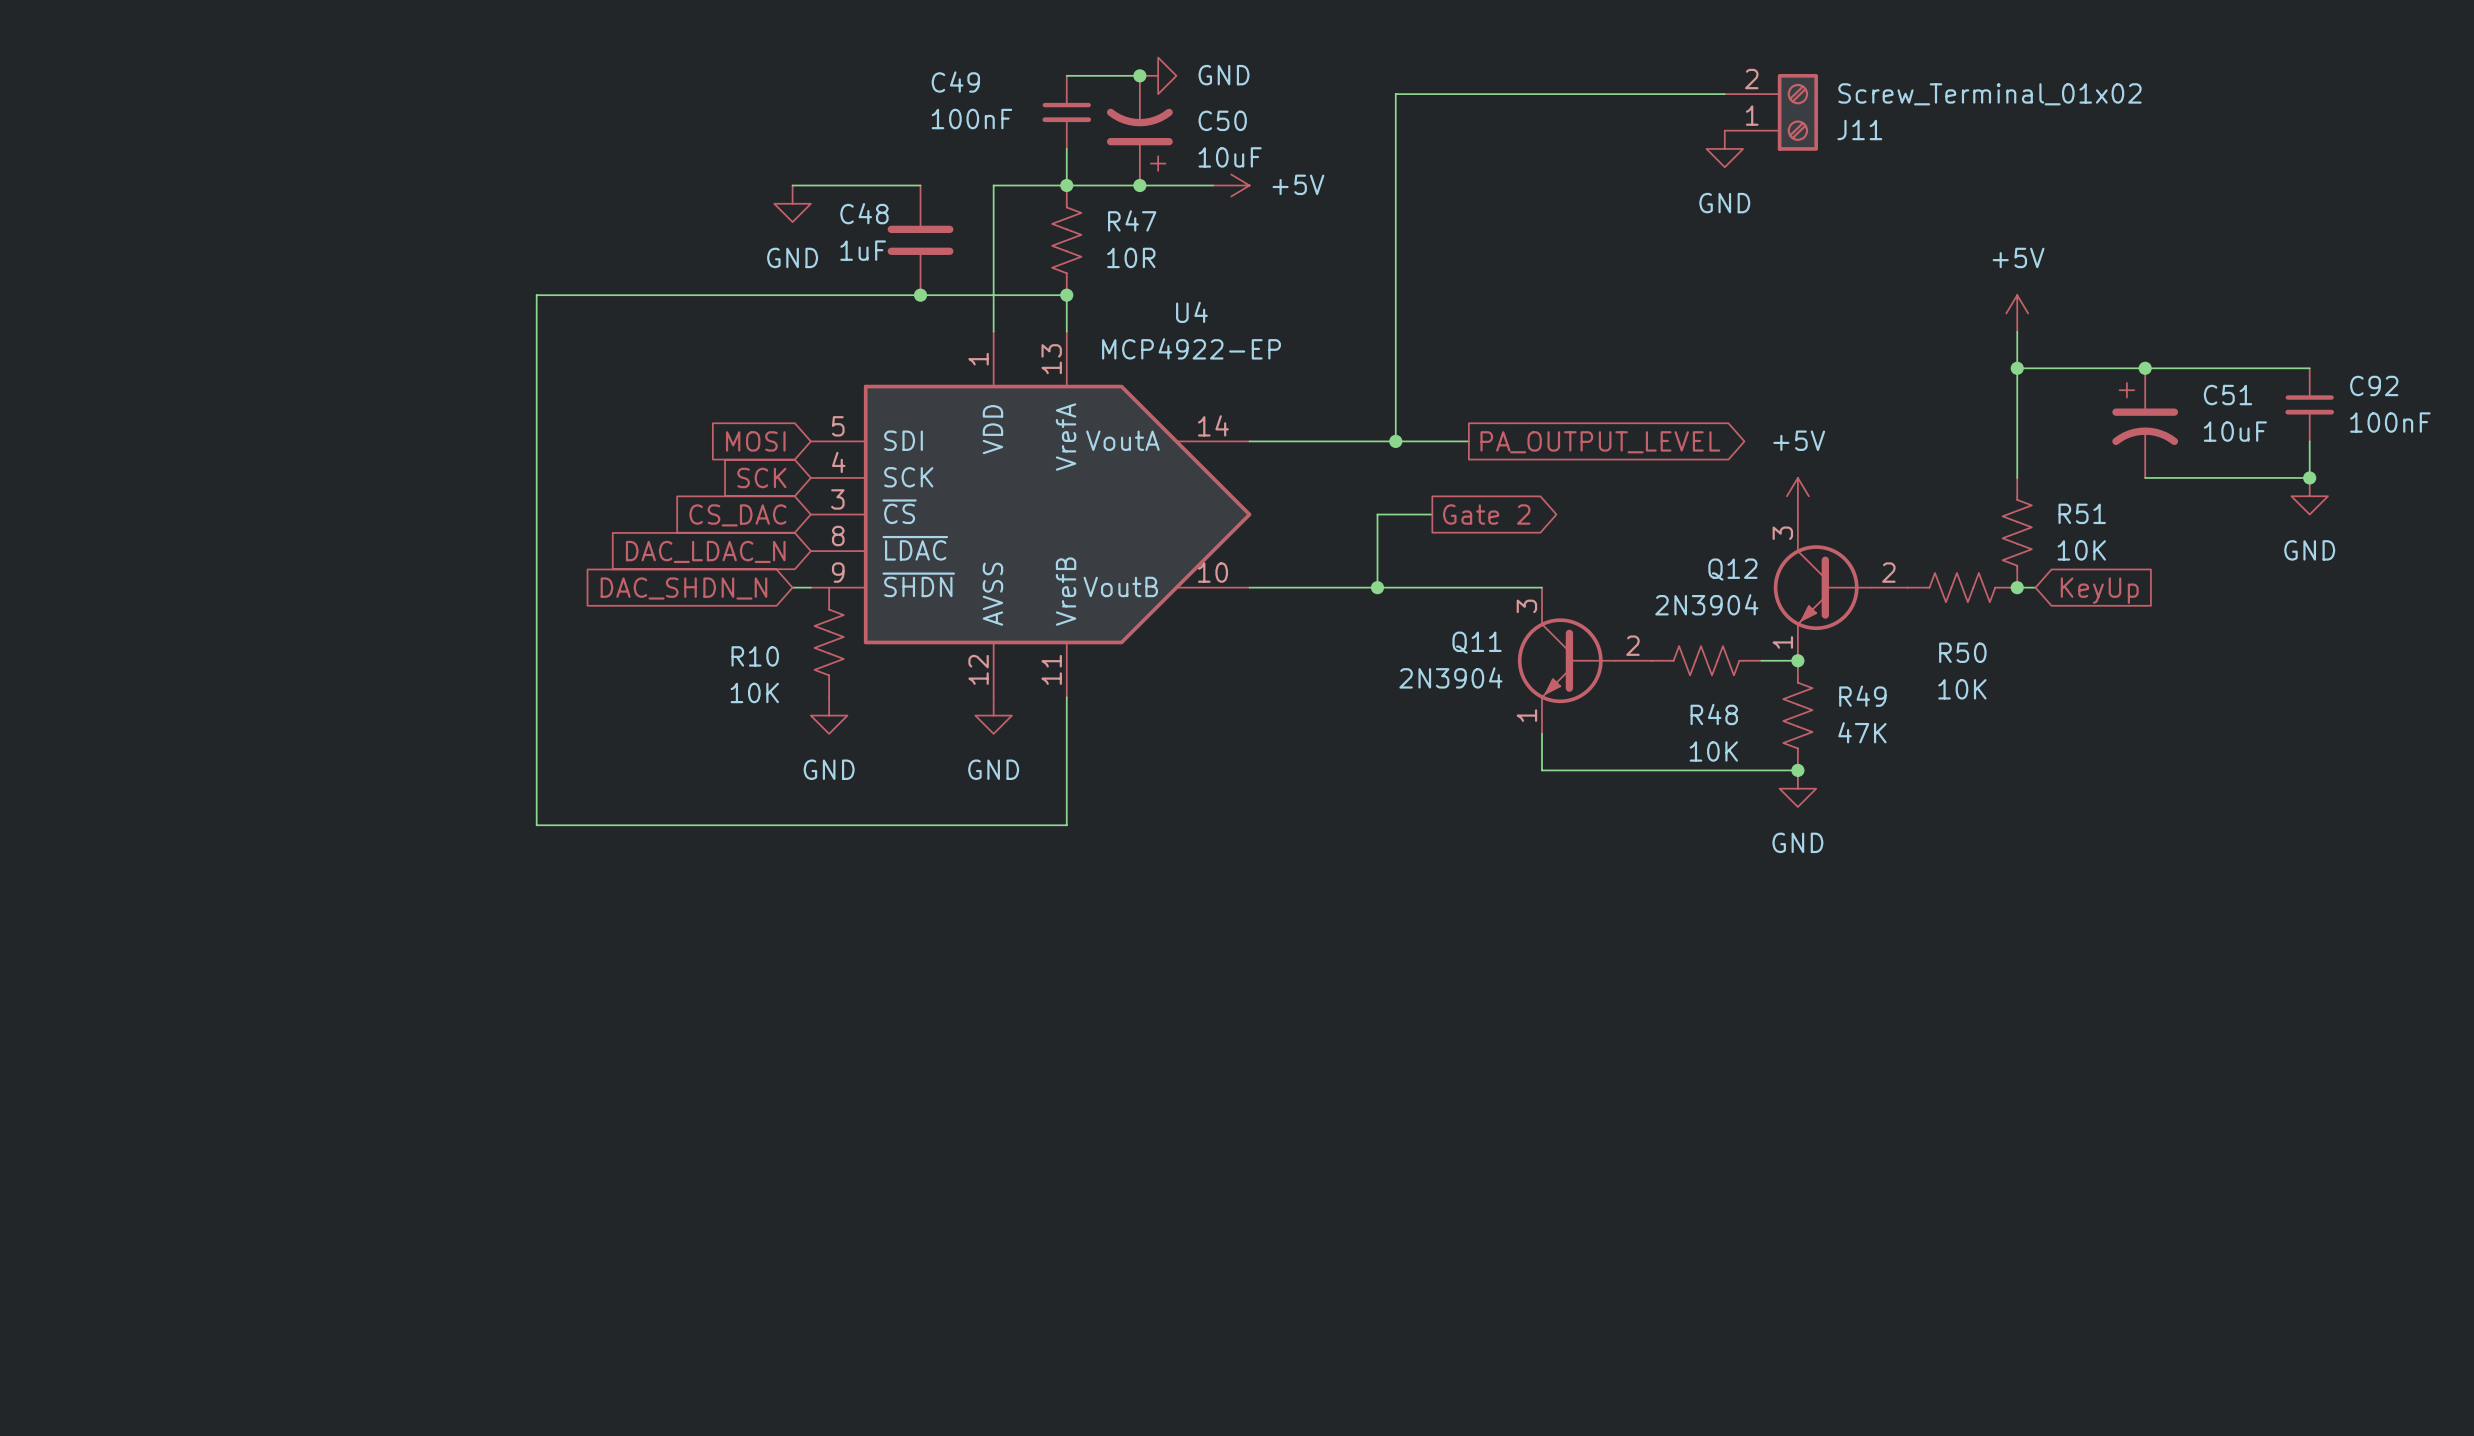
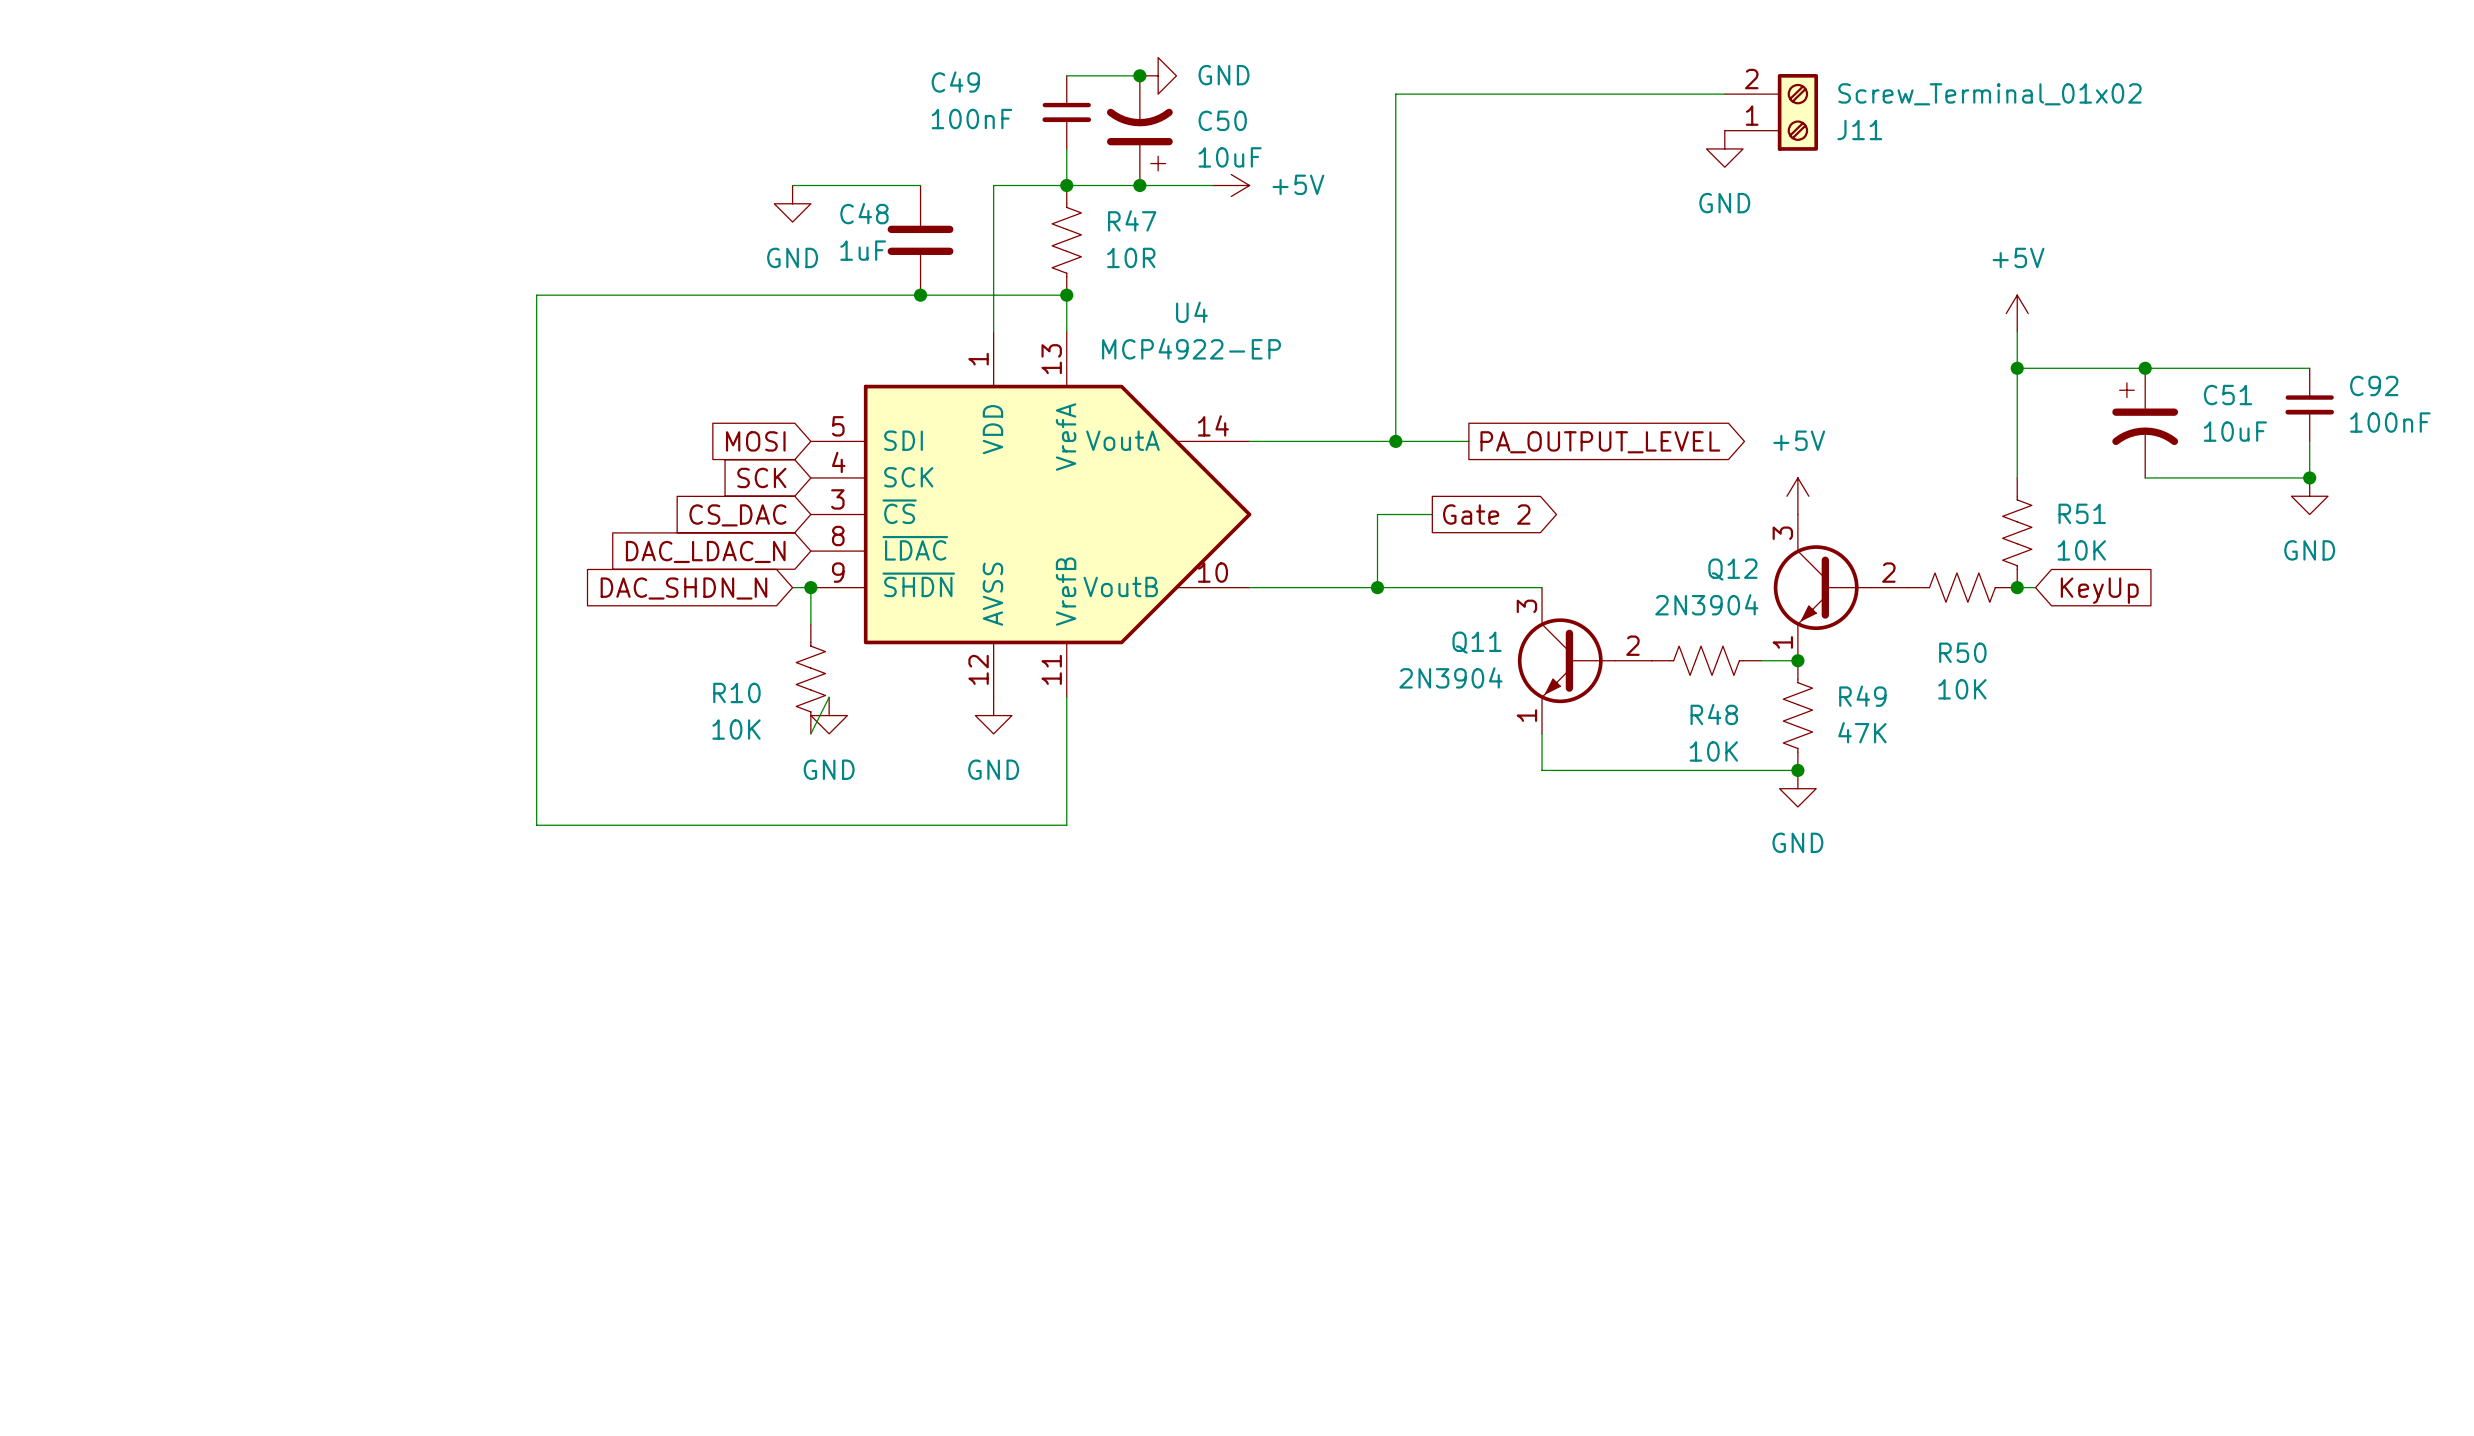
wire: none -> (810, 587) (810, 624)
junction: none -> (810, 587)
R10 position: (829, 642) -> (810, 679)
wire: none -> (829, 697) (810, 733)

